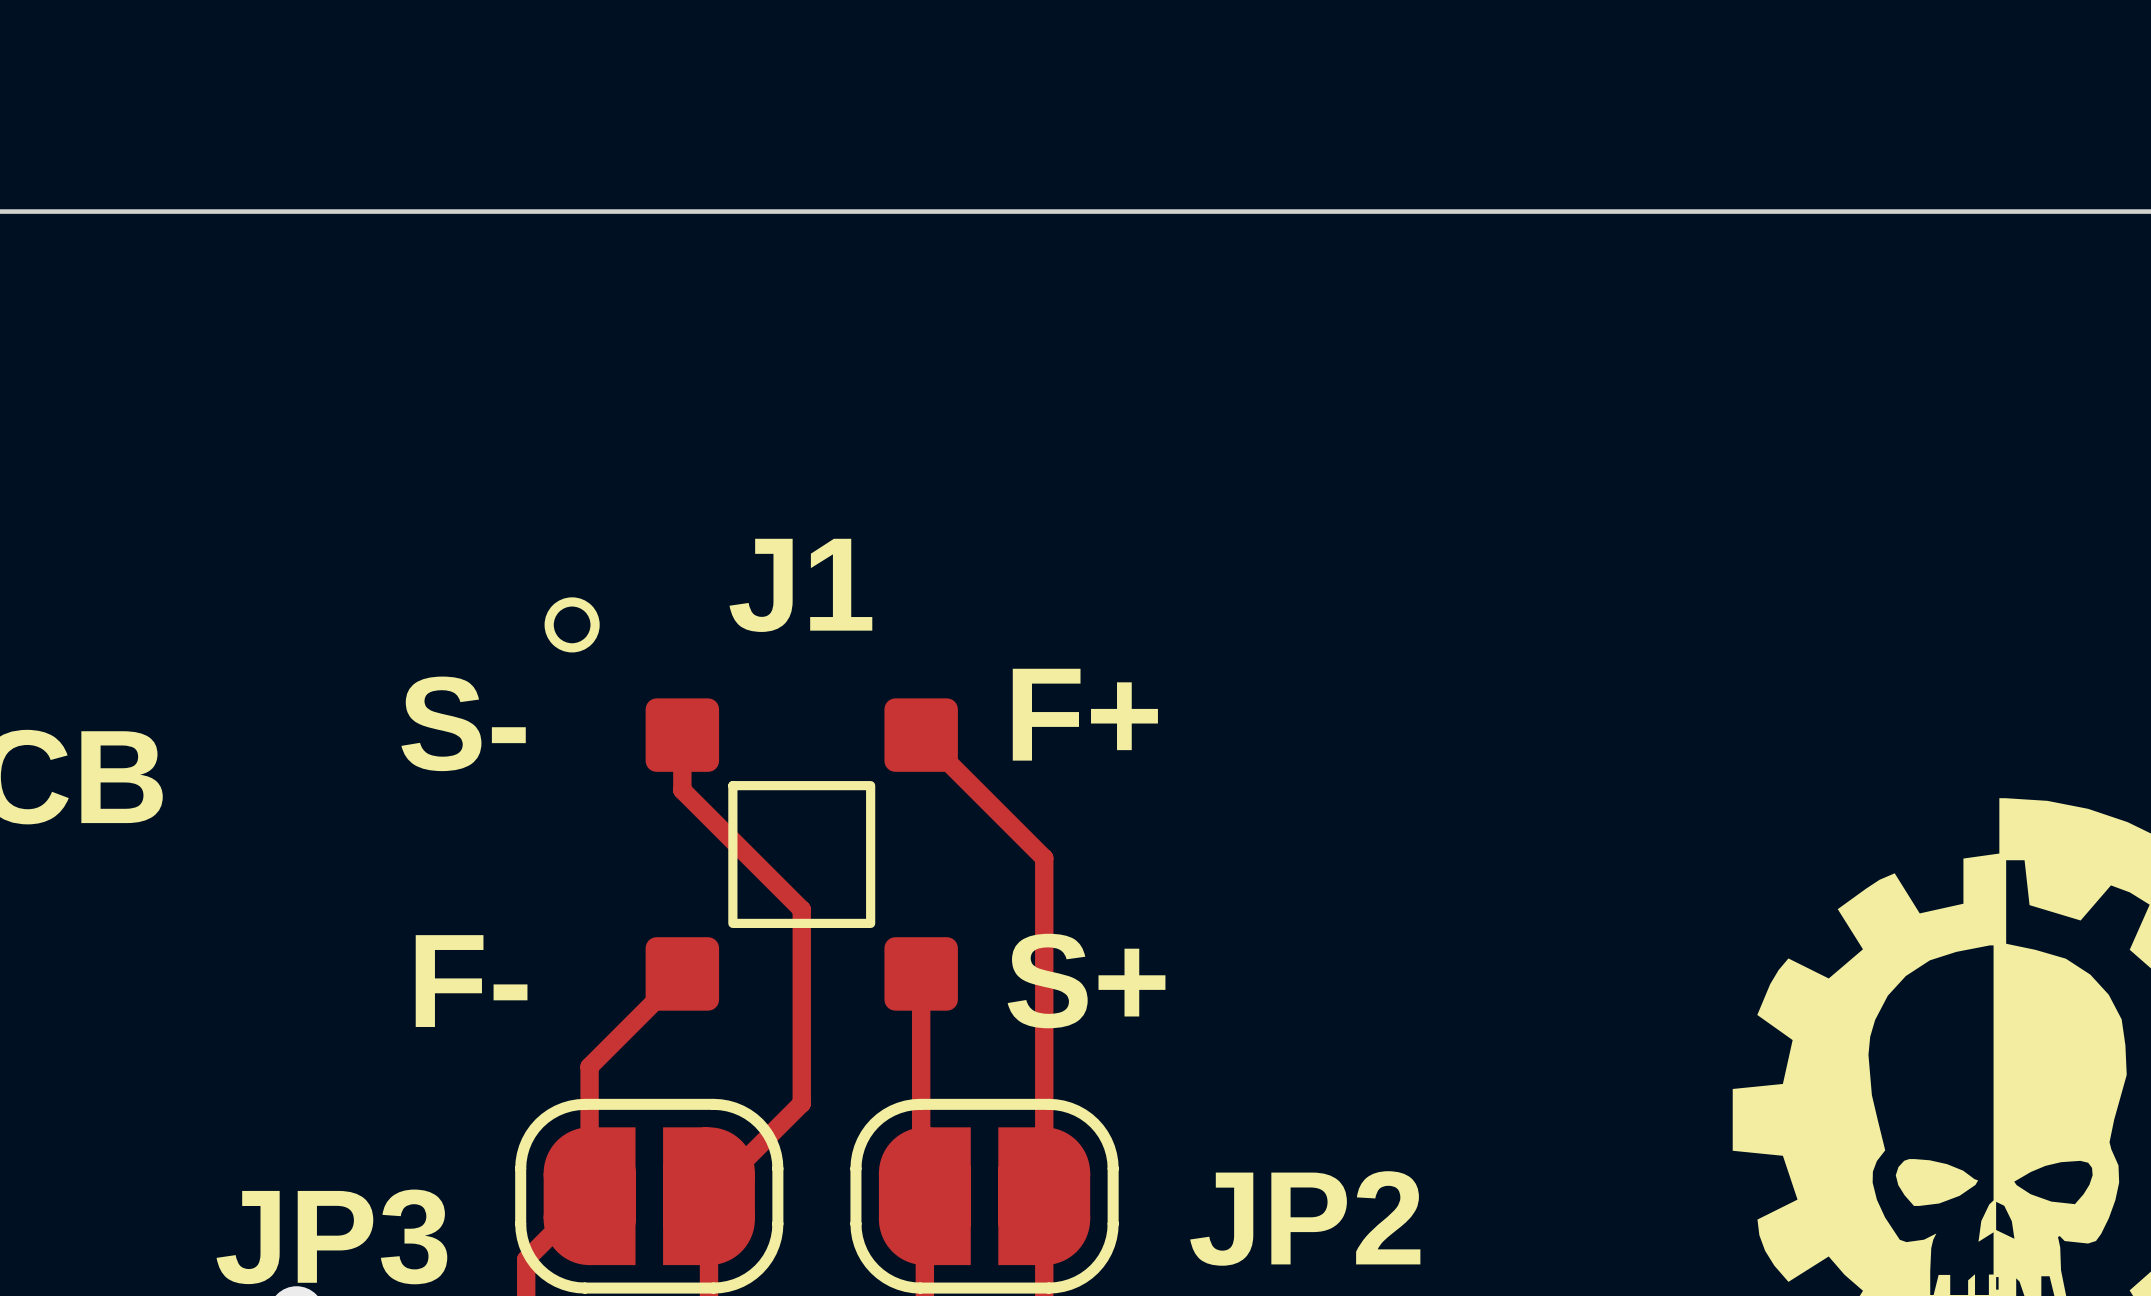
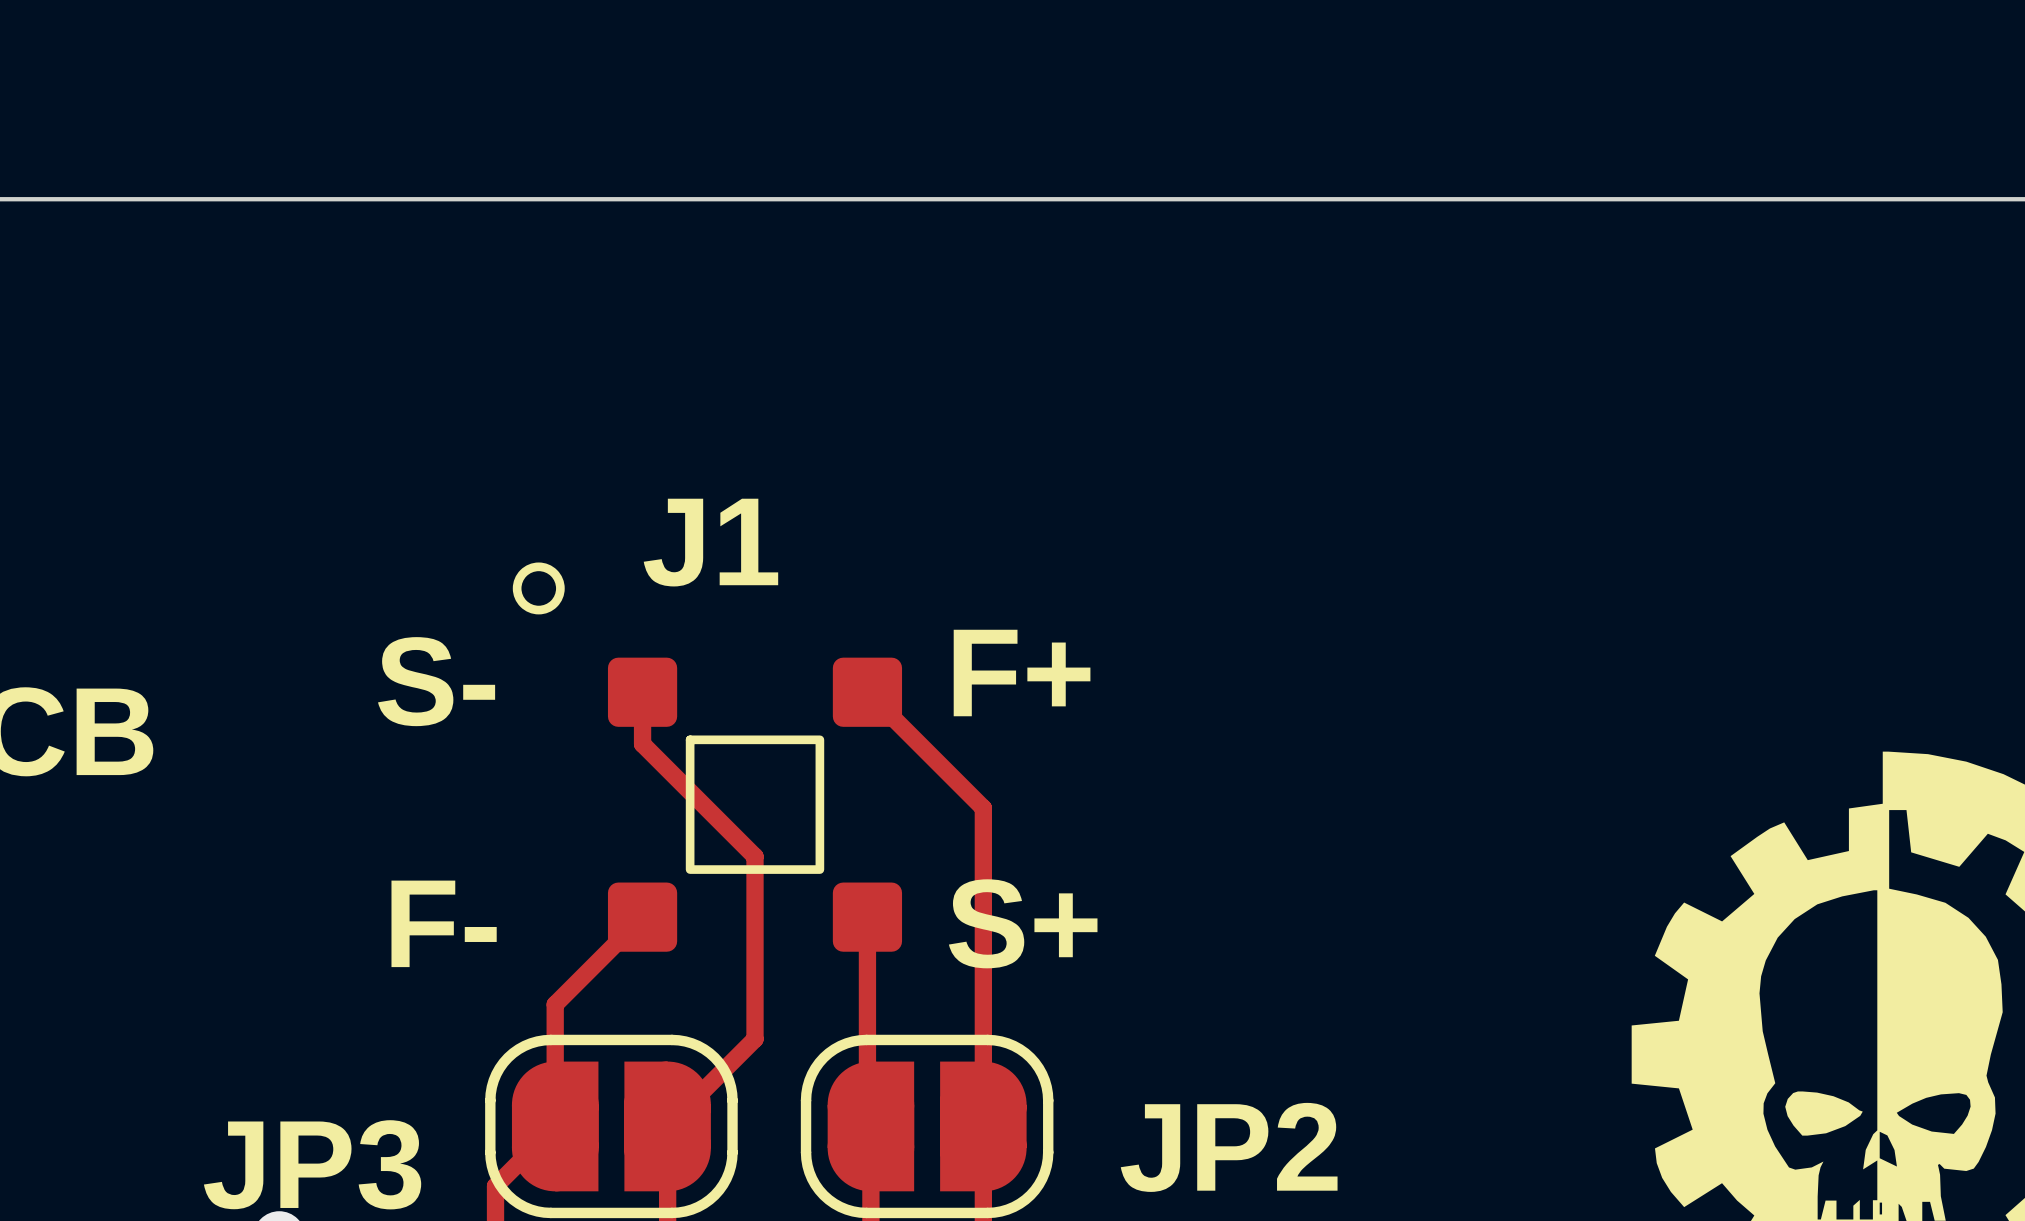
J1 name position: J1 (800, 585) -> J1 (710, 542)

